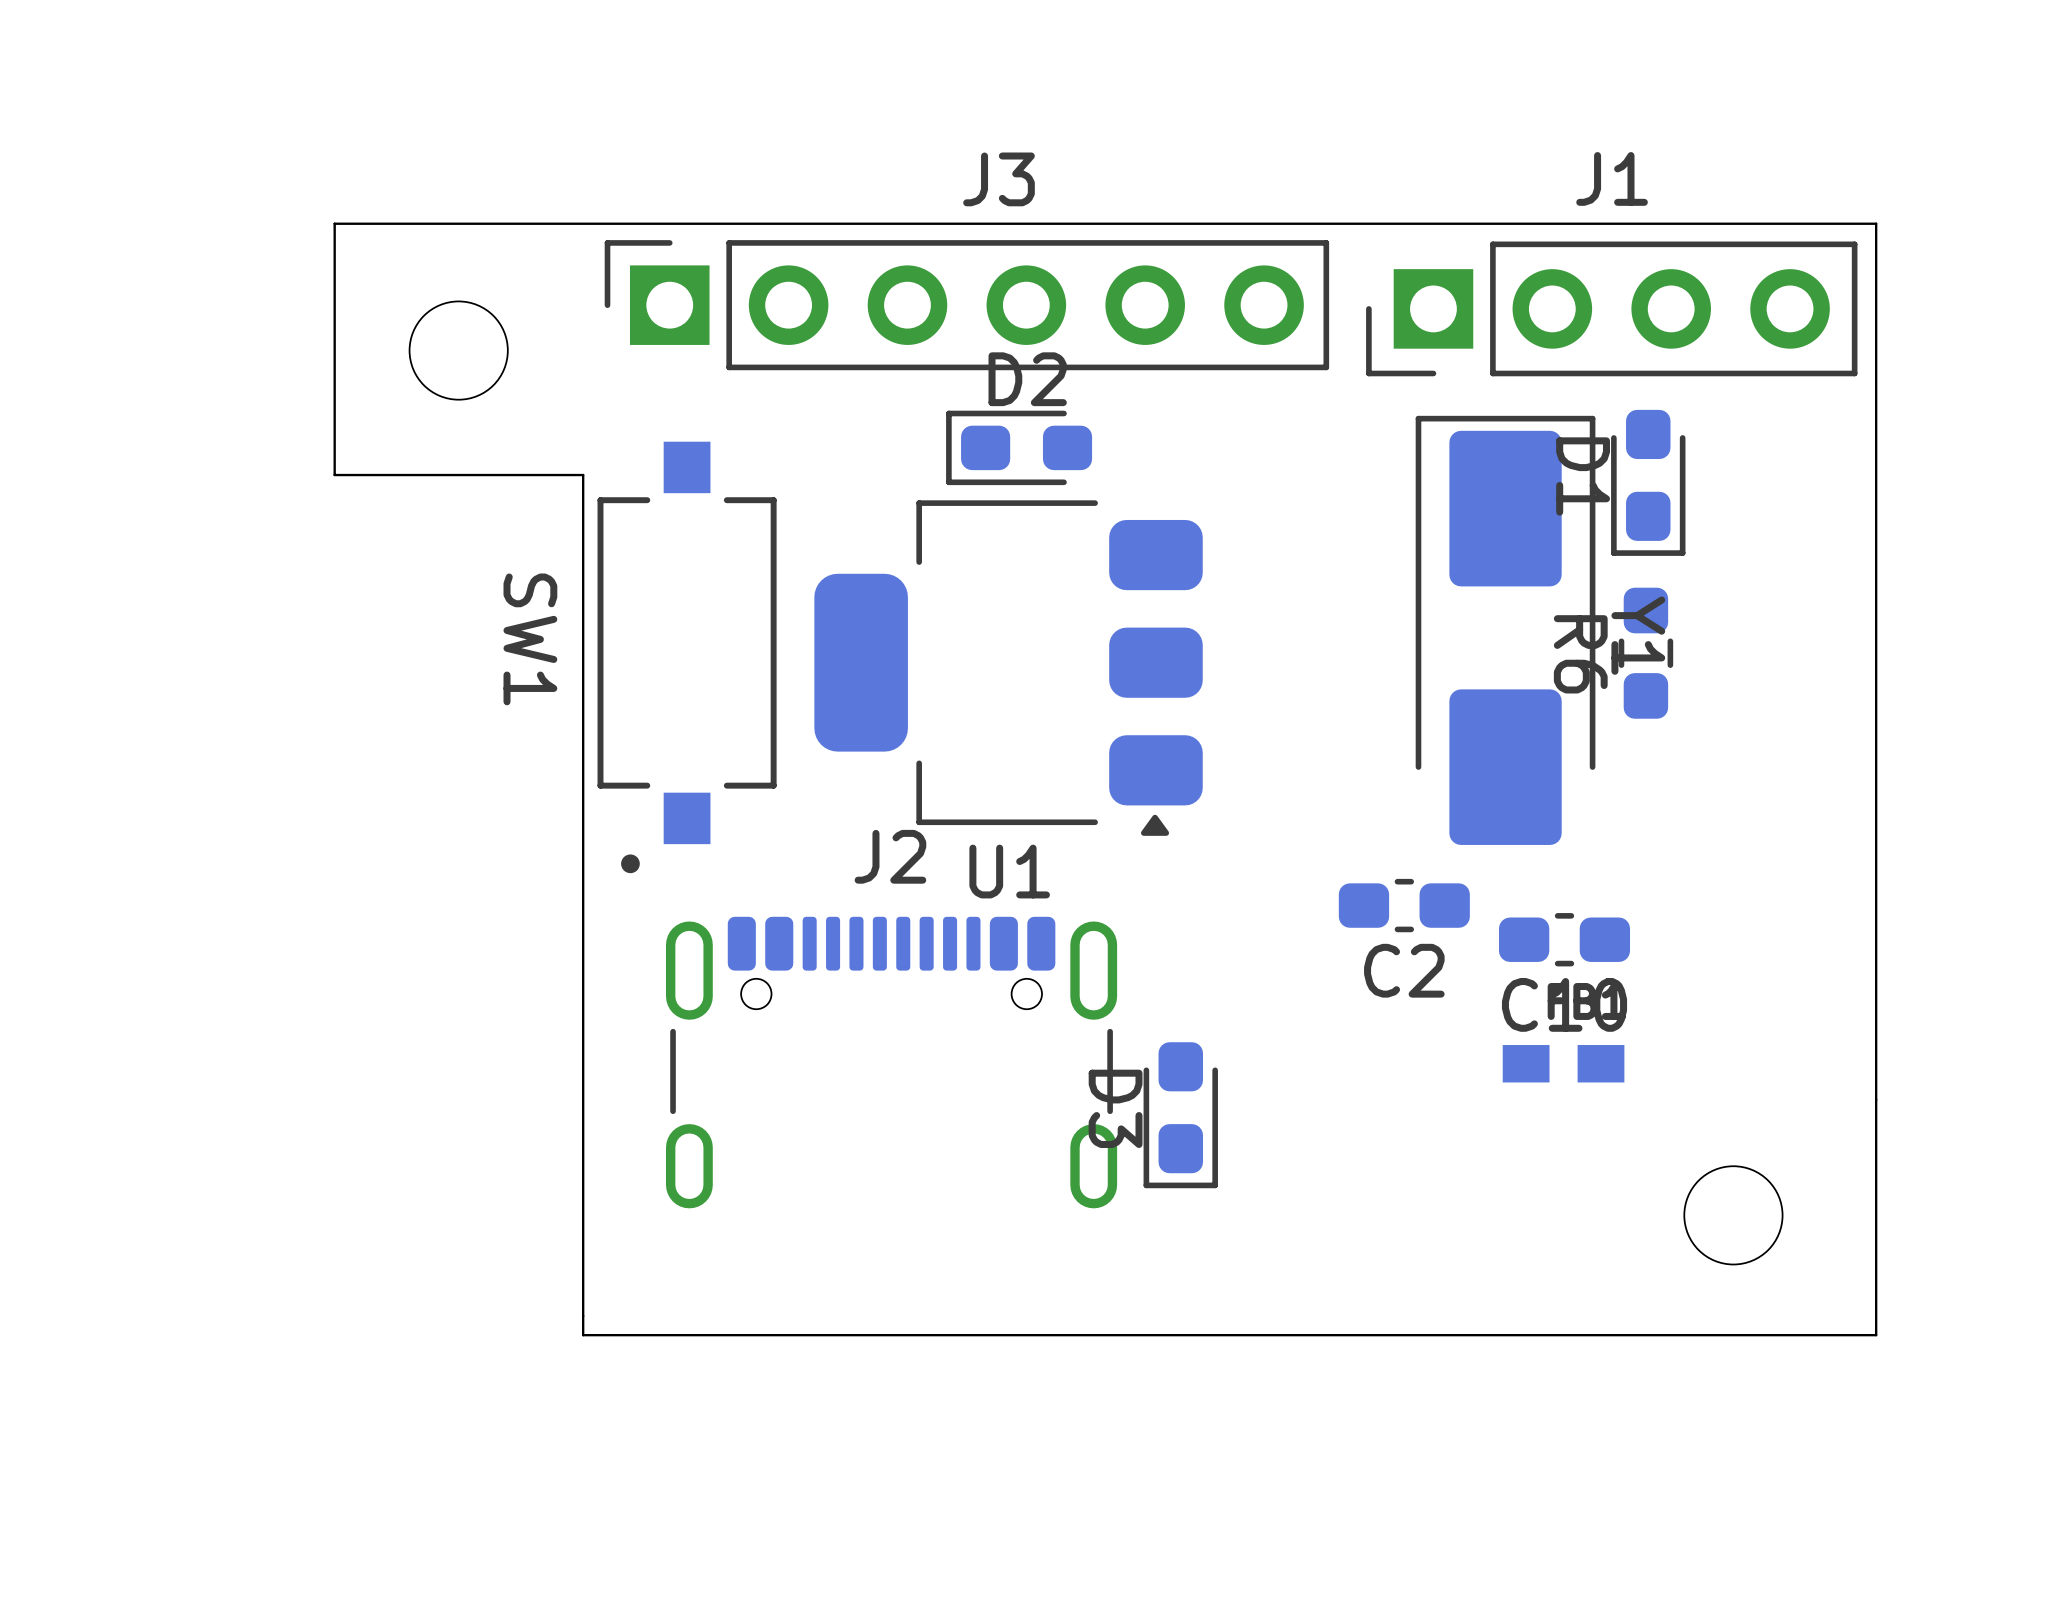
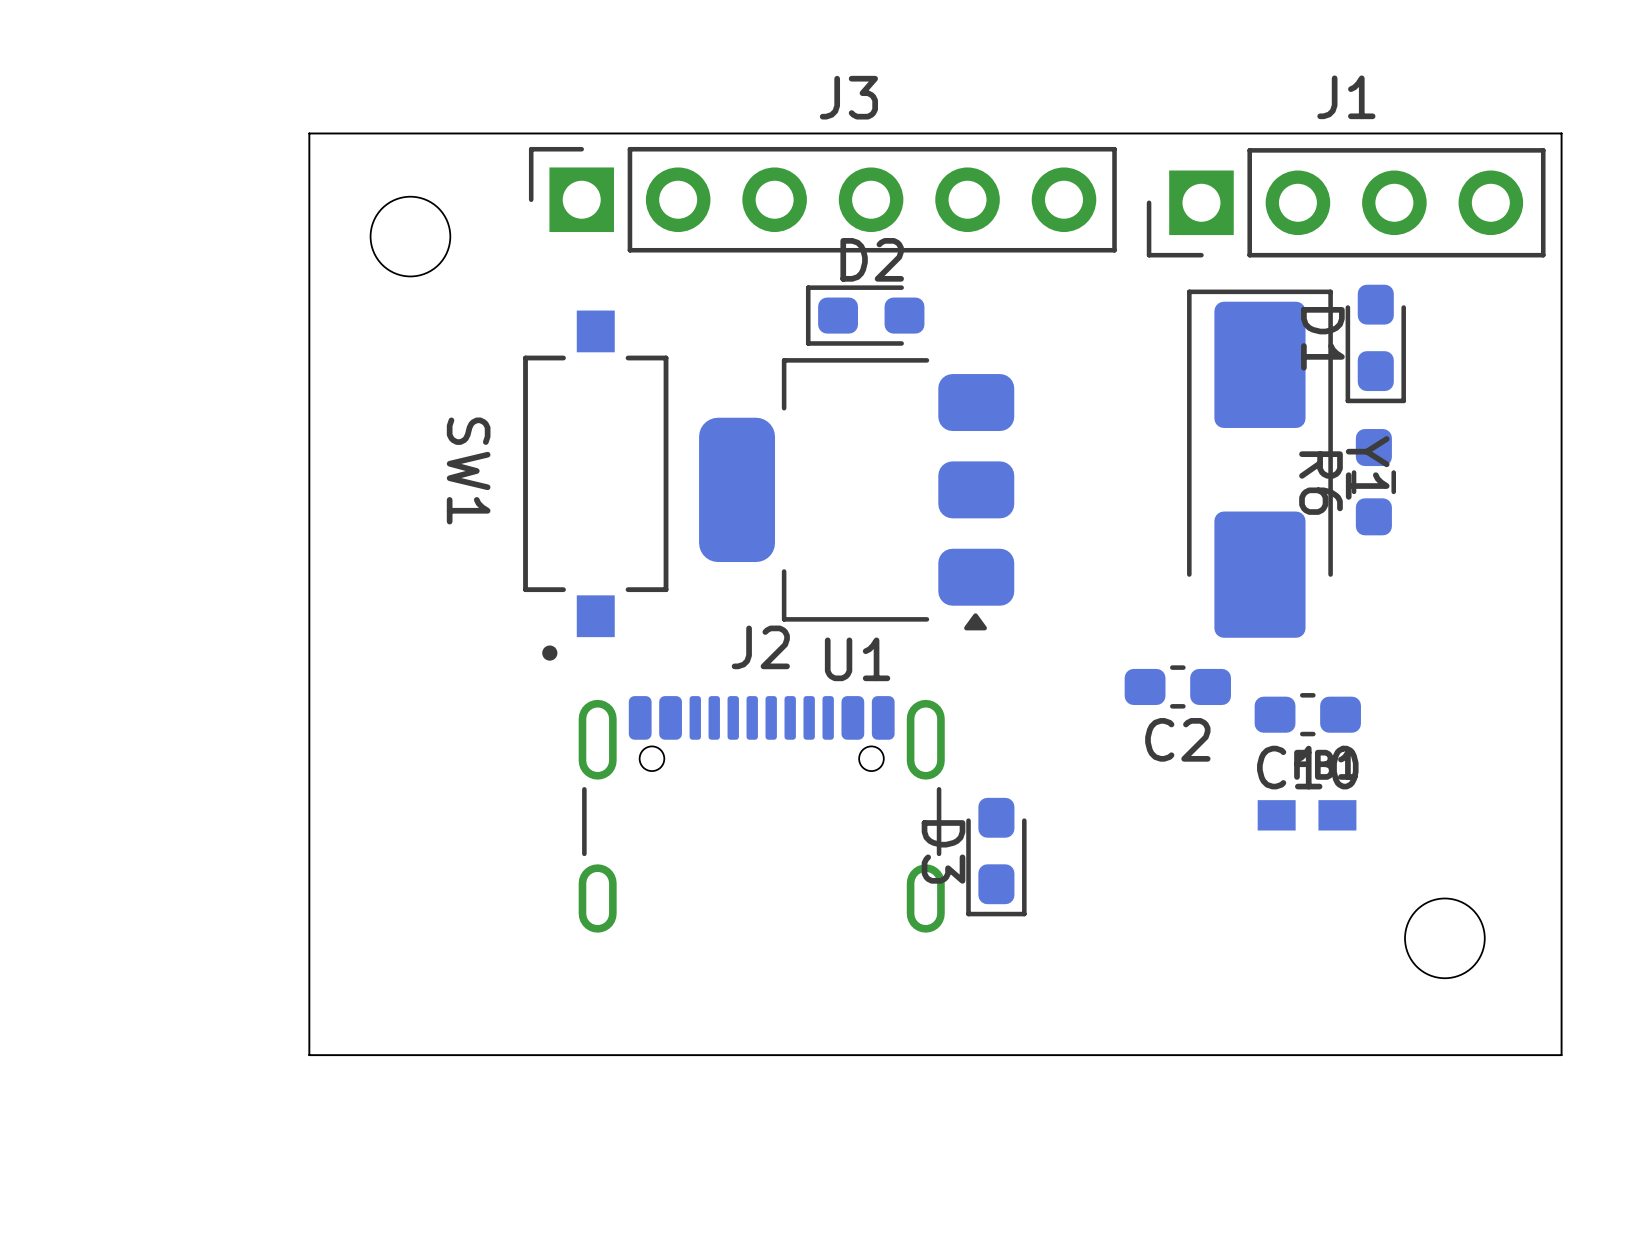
board edge: (1876, 223) (1876, 1335) (583, 1335) (583, 475) (334, 475) (334, 223) (1876, 223) -> (1561, 133) (1561, 1055) (309, 1055) (309, 133) (1561, 133)

